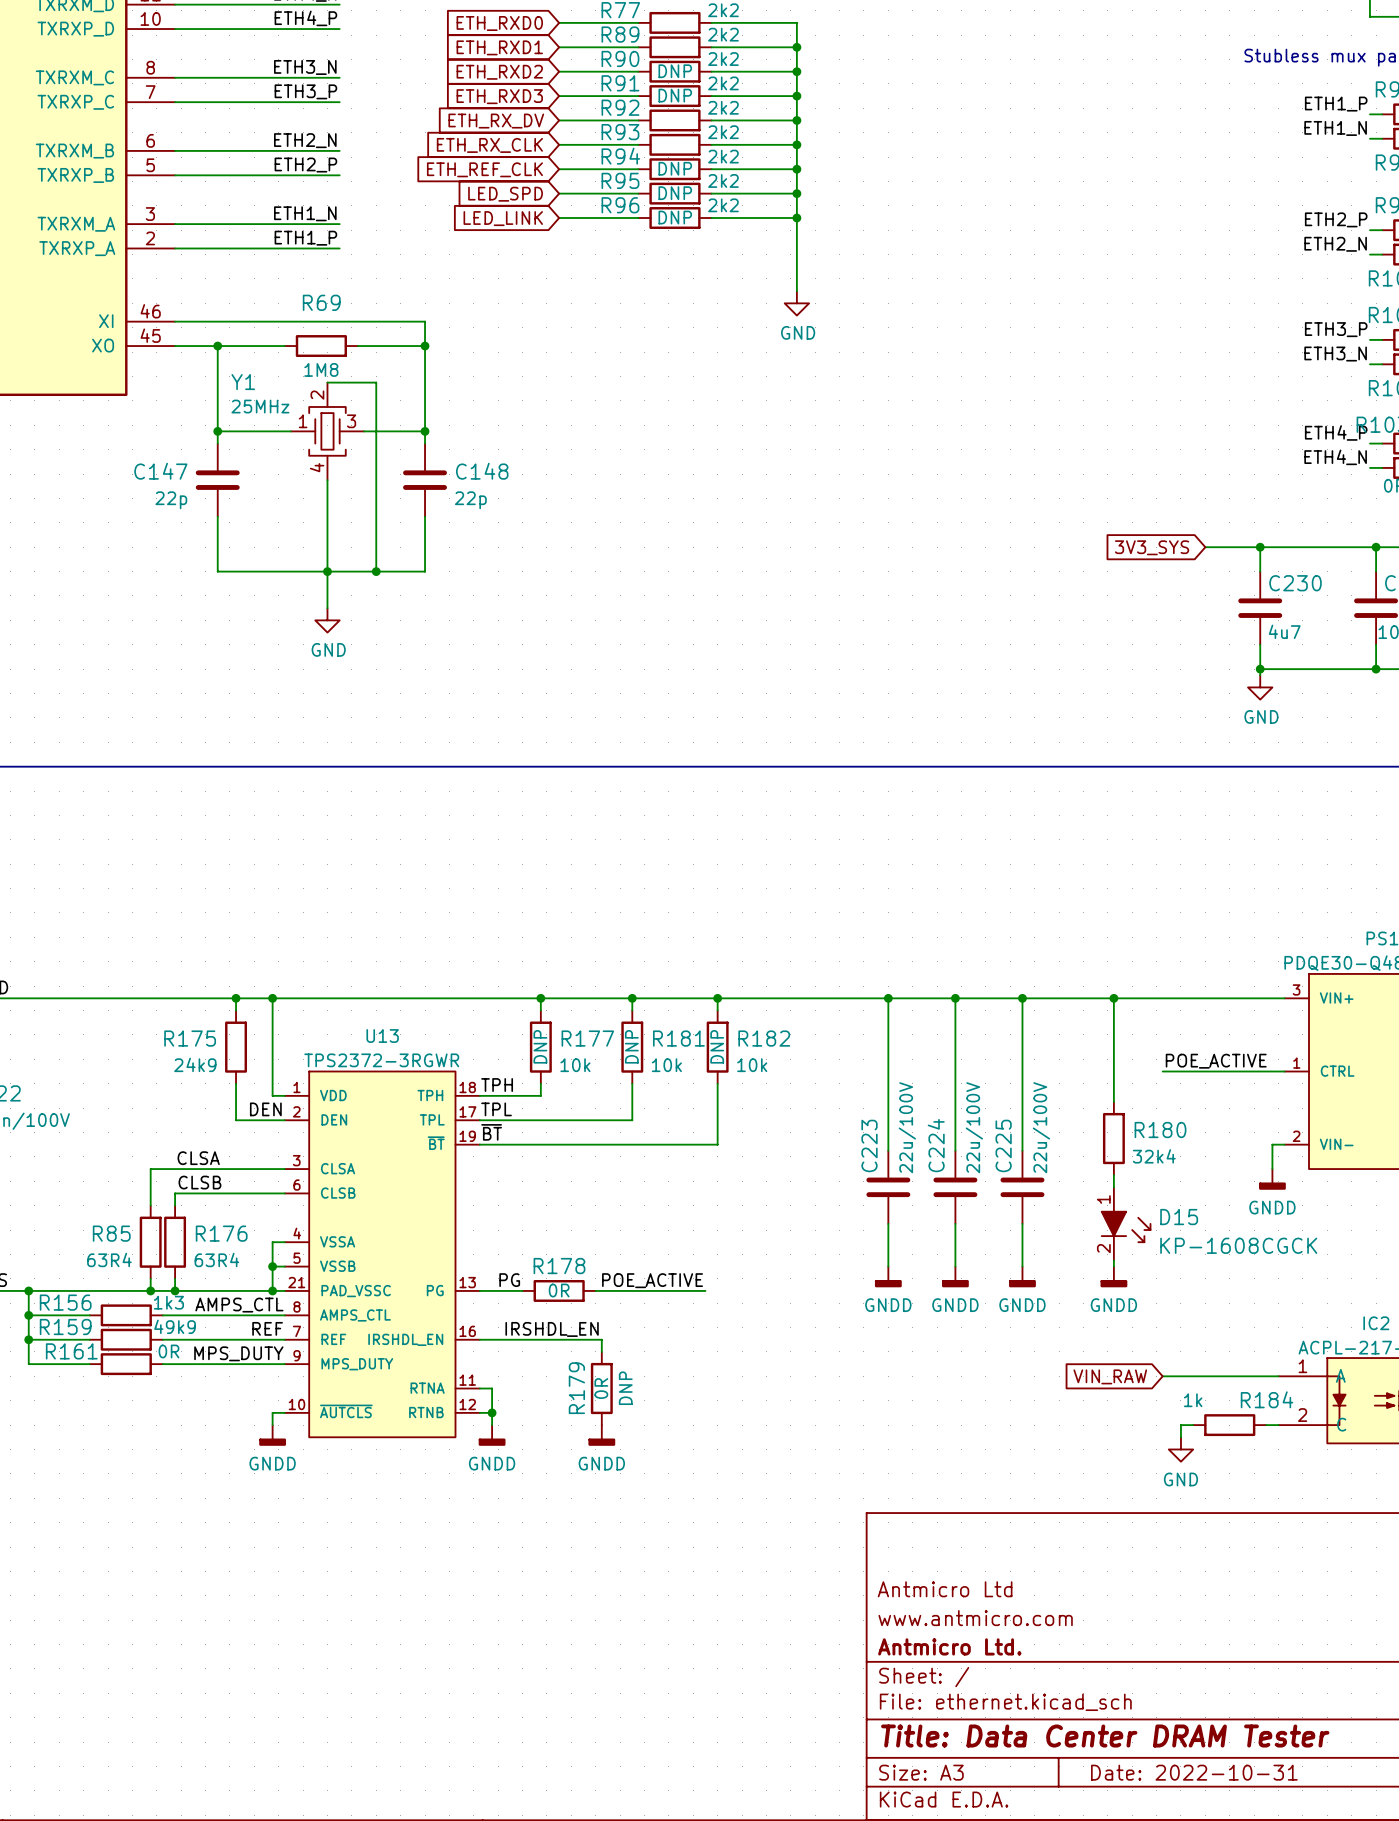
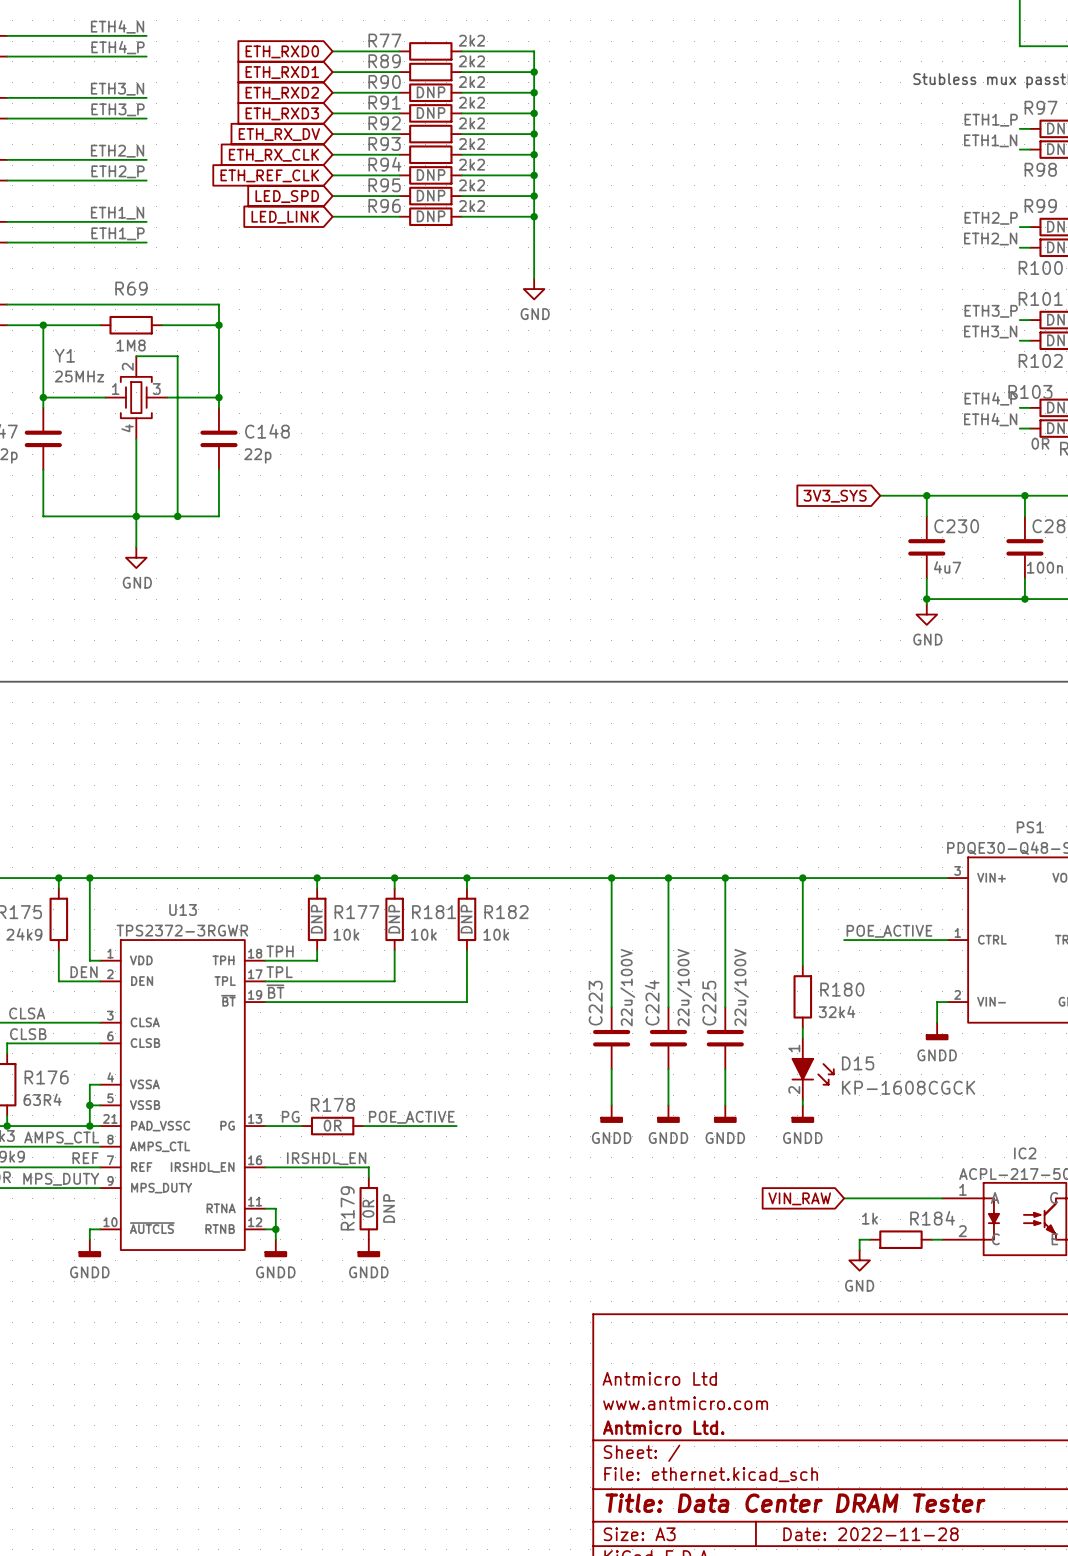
title block: Date: 2022-10-31 (1194, 1772) -> Date: 2022-11-28 (870, 1534)

